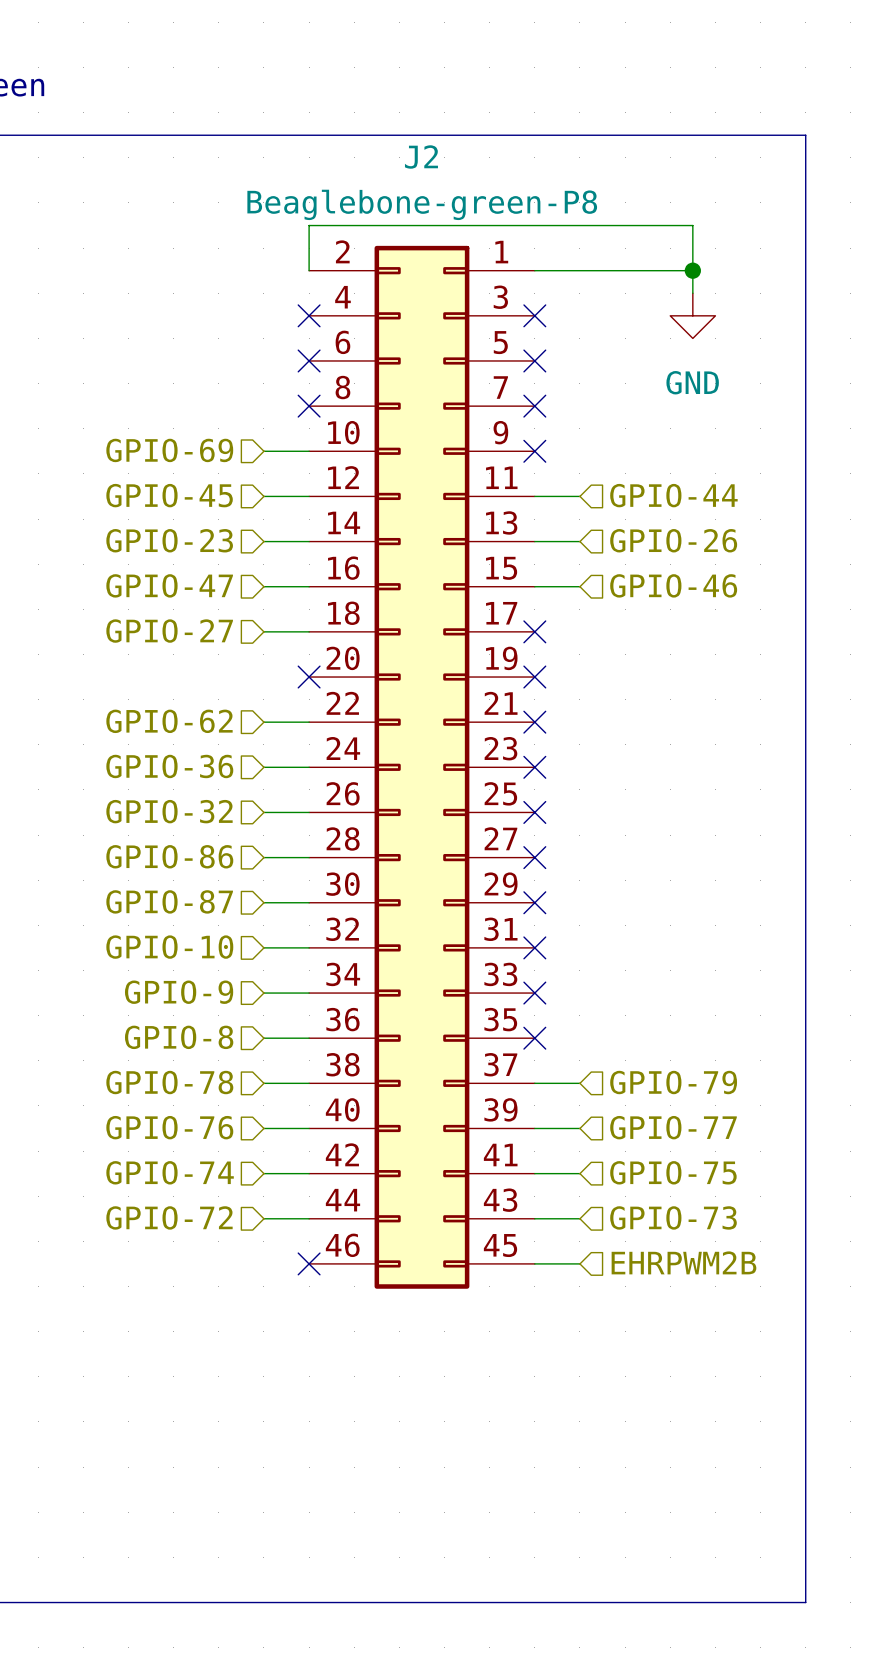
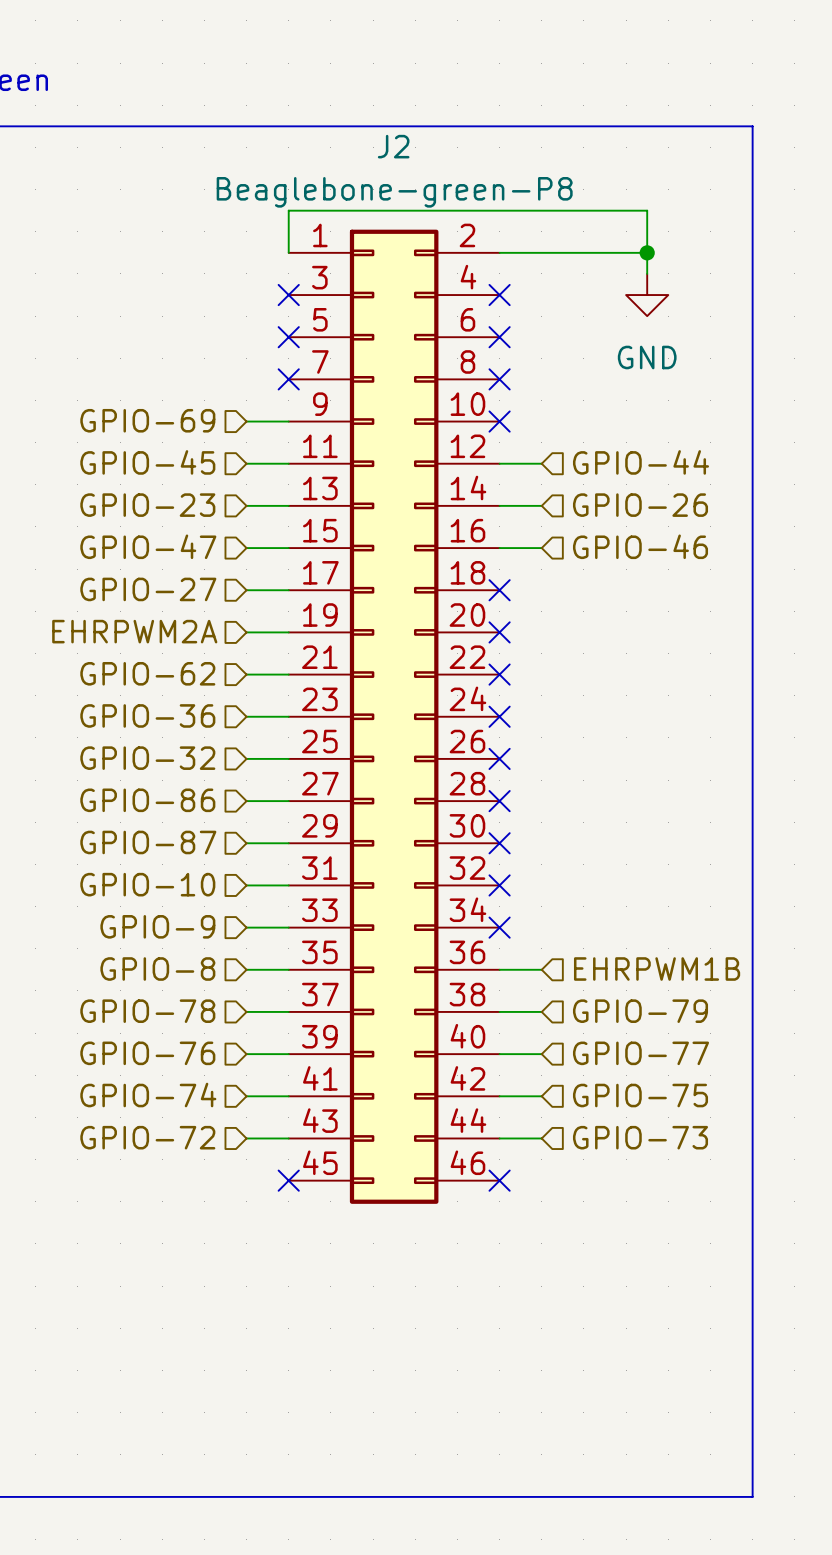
hierarchical label: none -> EHRPWM2A (134, 631)
wire: none -> (246, 632) (288, 632)
no-connect mark: (309, 677) -> none
J2 flip: as is (421, 767) -> left-right (394, 716)
hierarchical label: none -> EHRPWM1B (657, 969)
no-connect mark: (534, 1038) -> none
hierarchical label: EHRPWM2B (683, 1262) -> none
wire: (534, 1263) (579, 1263) -> (499, 969) (541, 969)
no-connect mark: none -> (499, 1180)

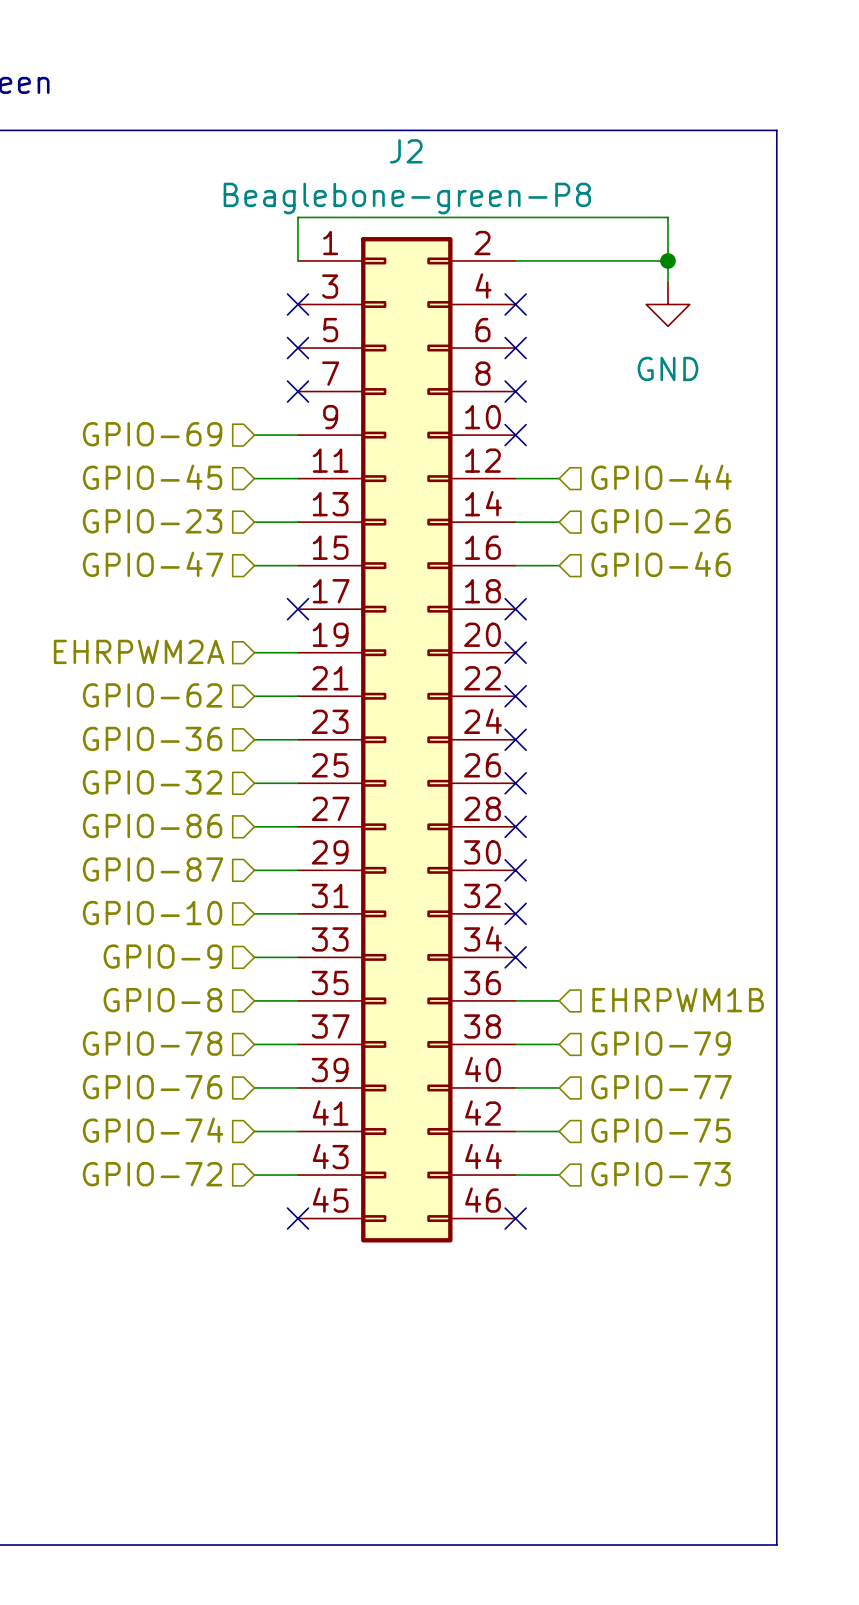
hierarchical label: GPIO-27 (148, 589) -> none
wire: (246, 590) (288, 590) -> none
no-connect mark: none -> (298, 609)

